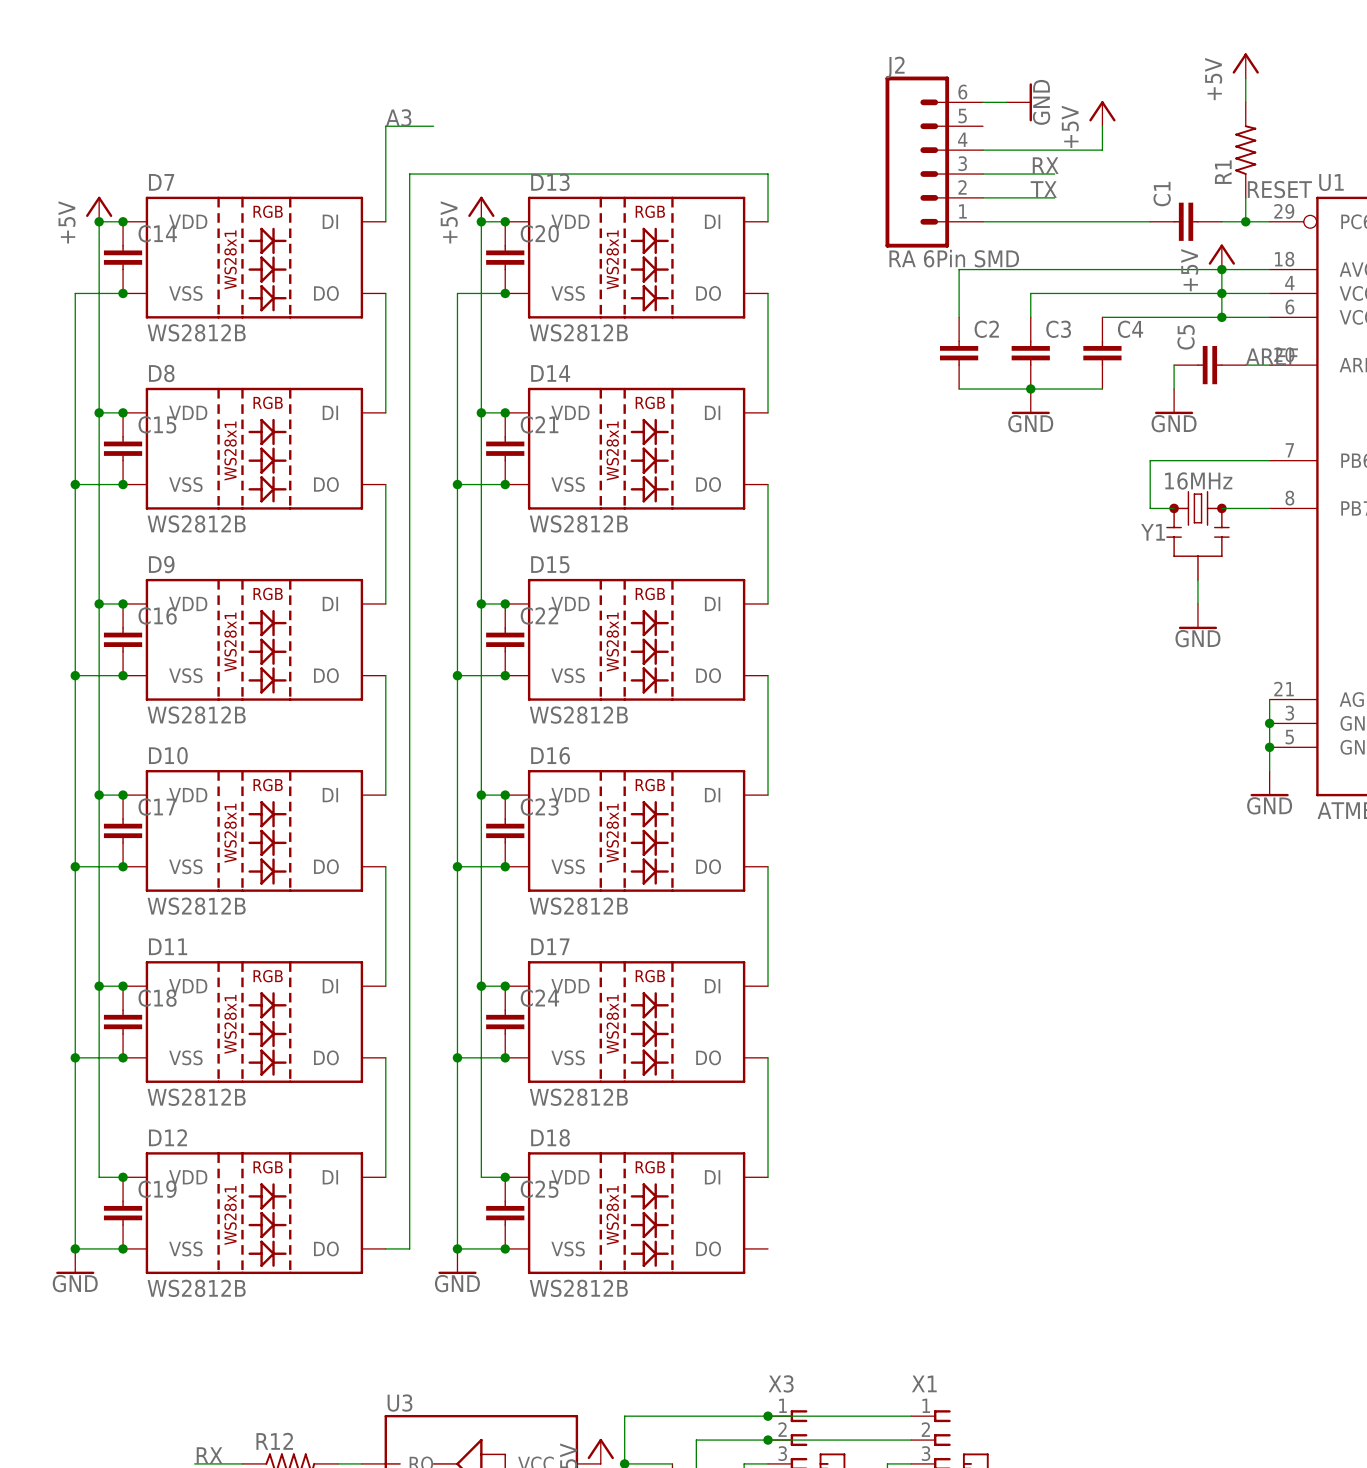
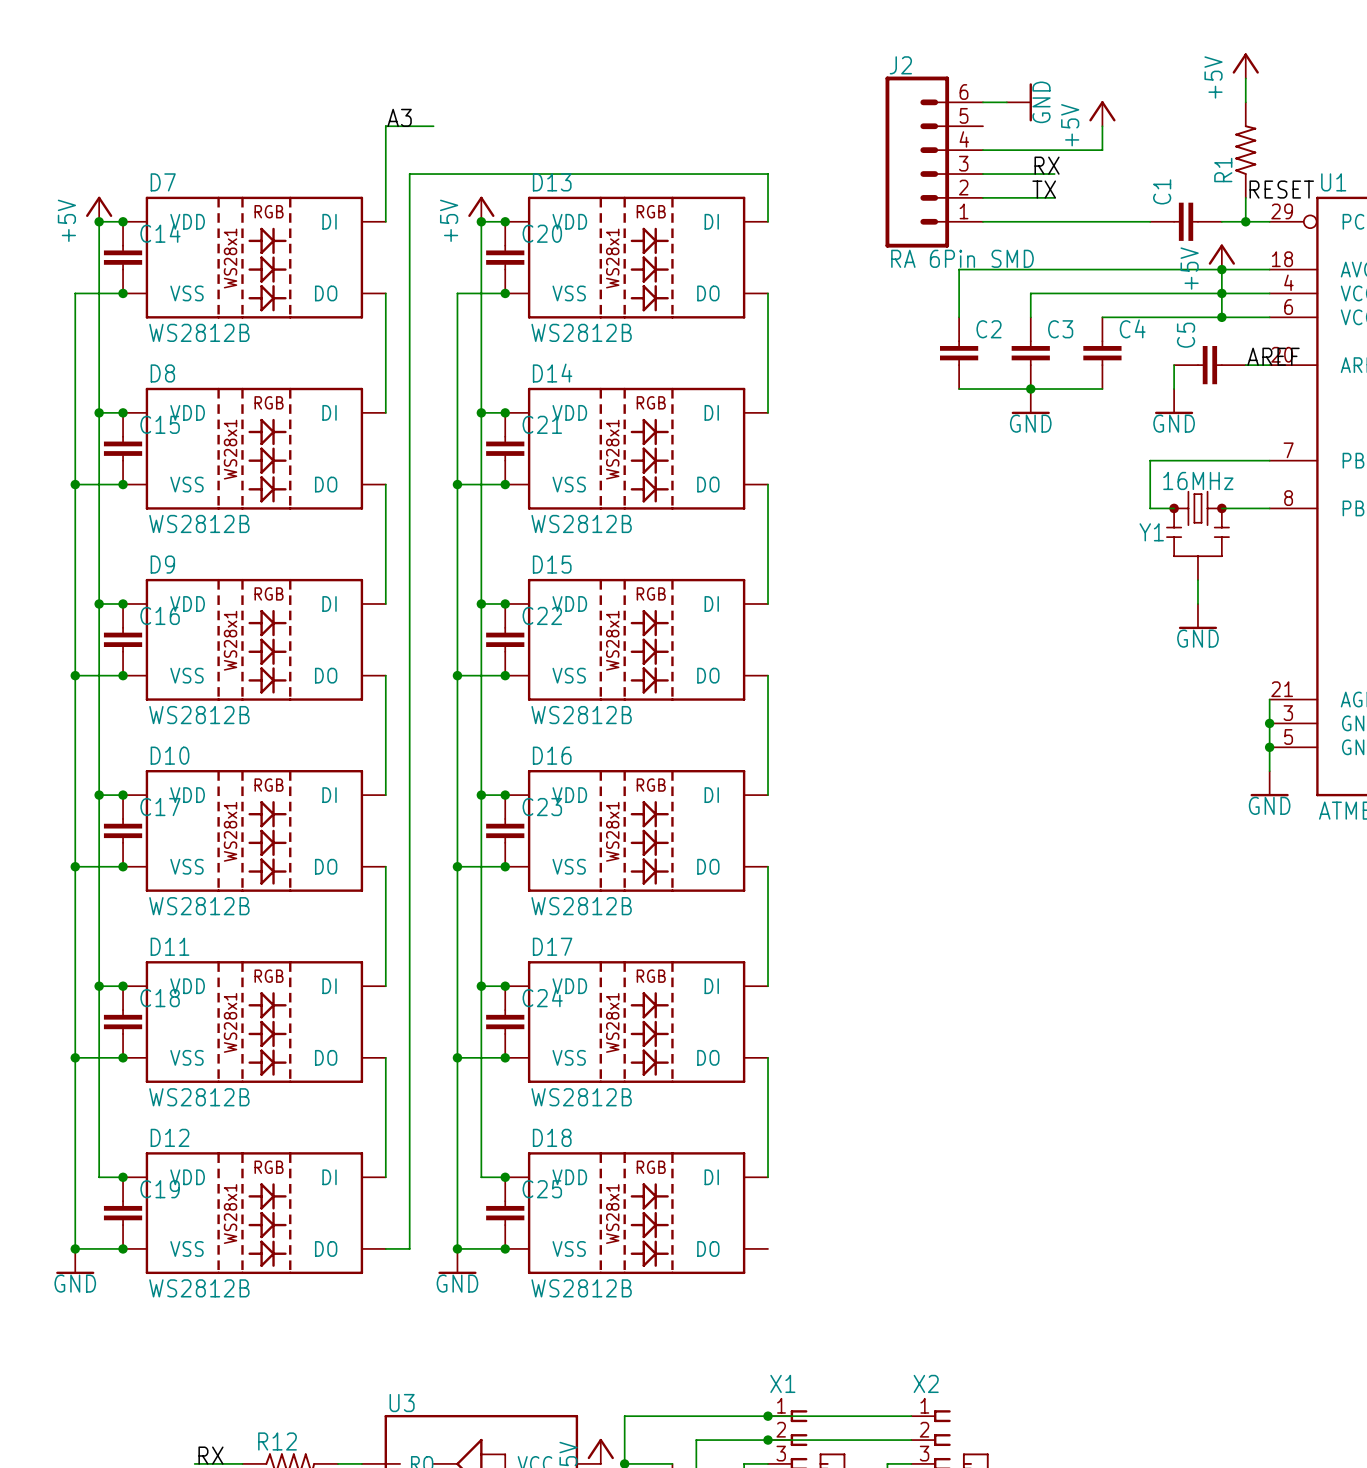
X3 name: X3 (781, 1383) -> X1 (782, 1383)
X1 name: X1 (924, 1383) -> X2 (926, 1383)

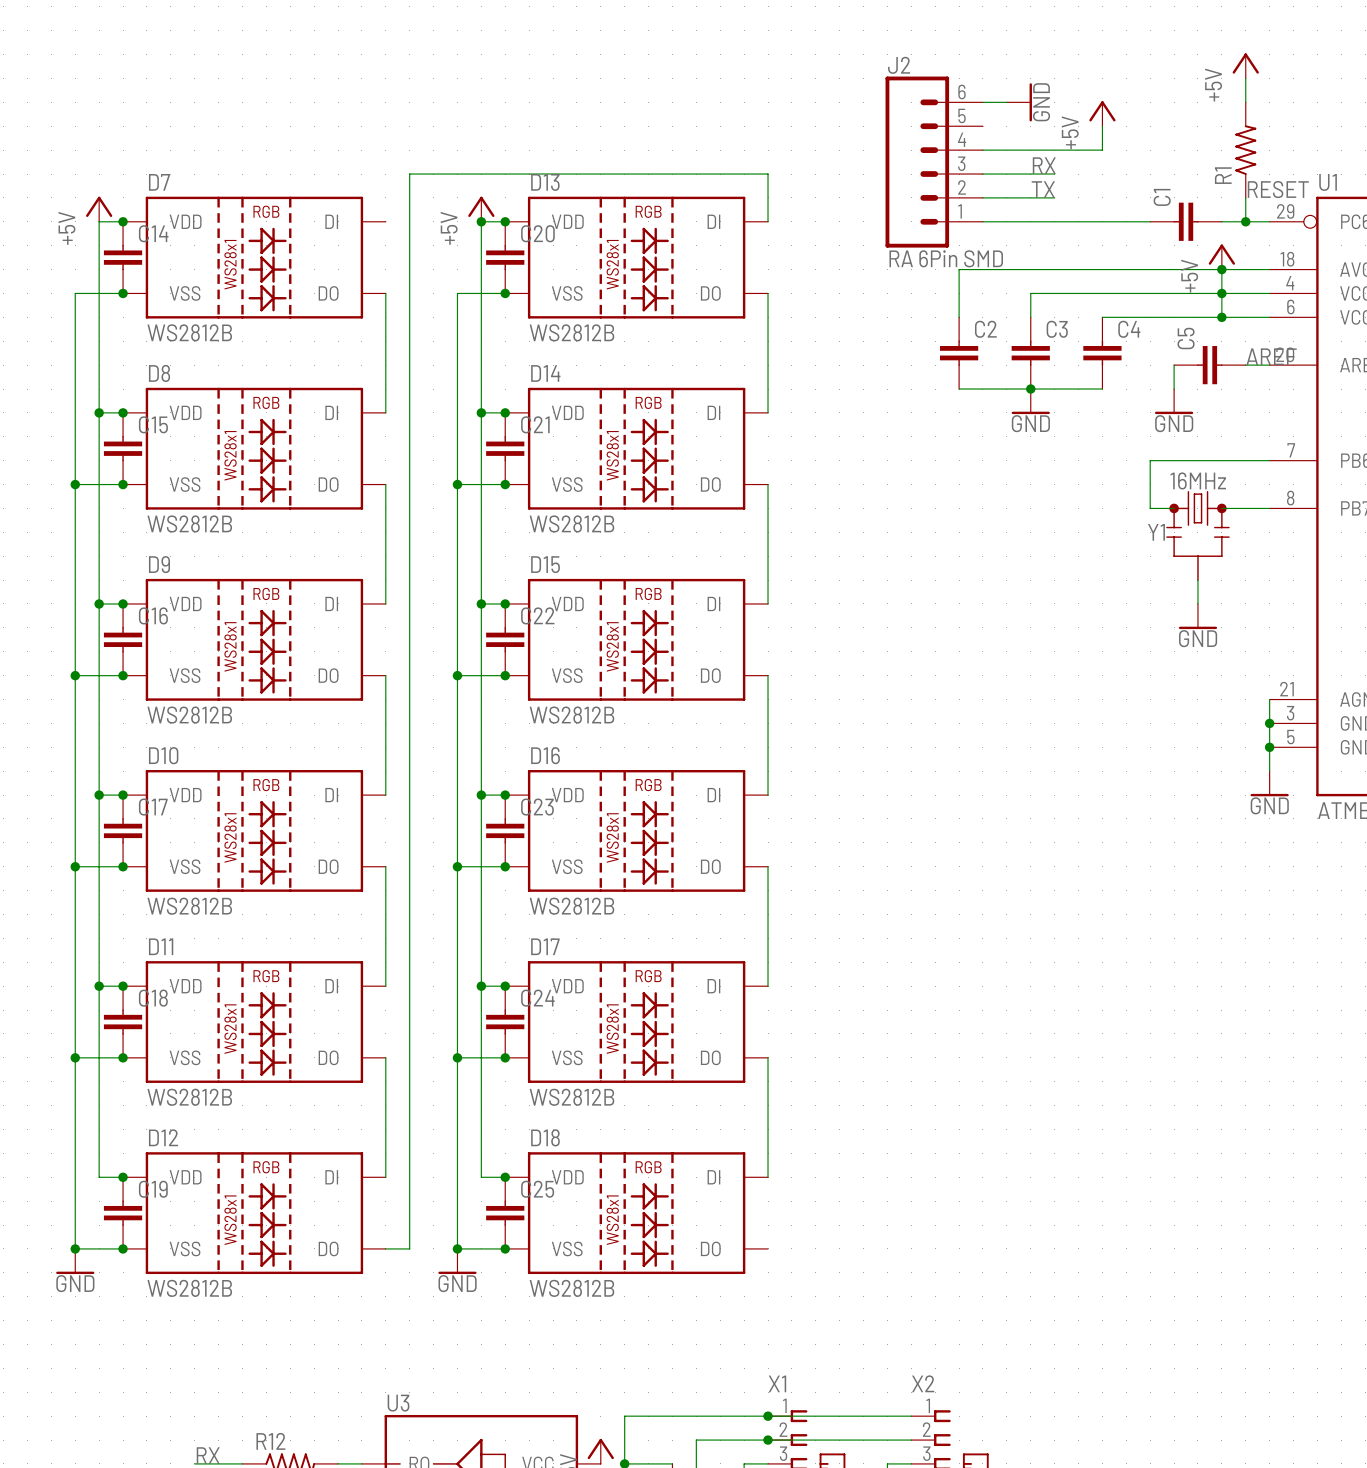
label: A3 (399, 117) -> none
wire: (433, 126) (385, 126) (385, 221) -> none
junction: (99, 221) -> none

